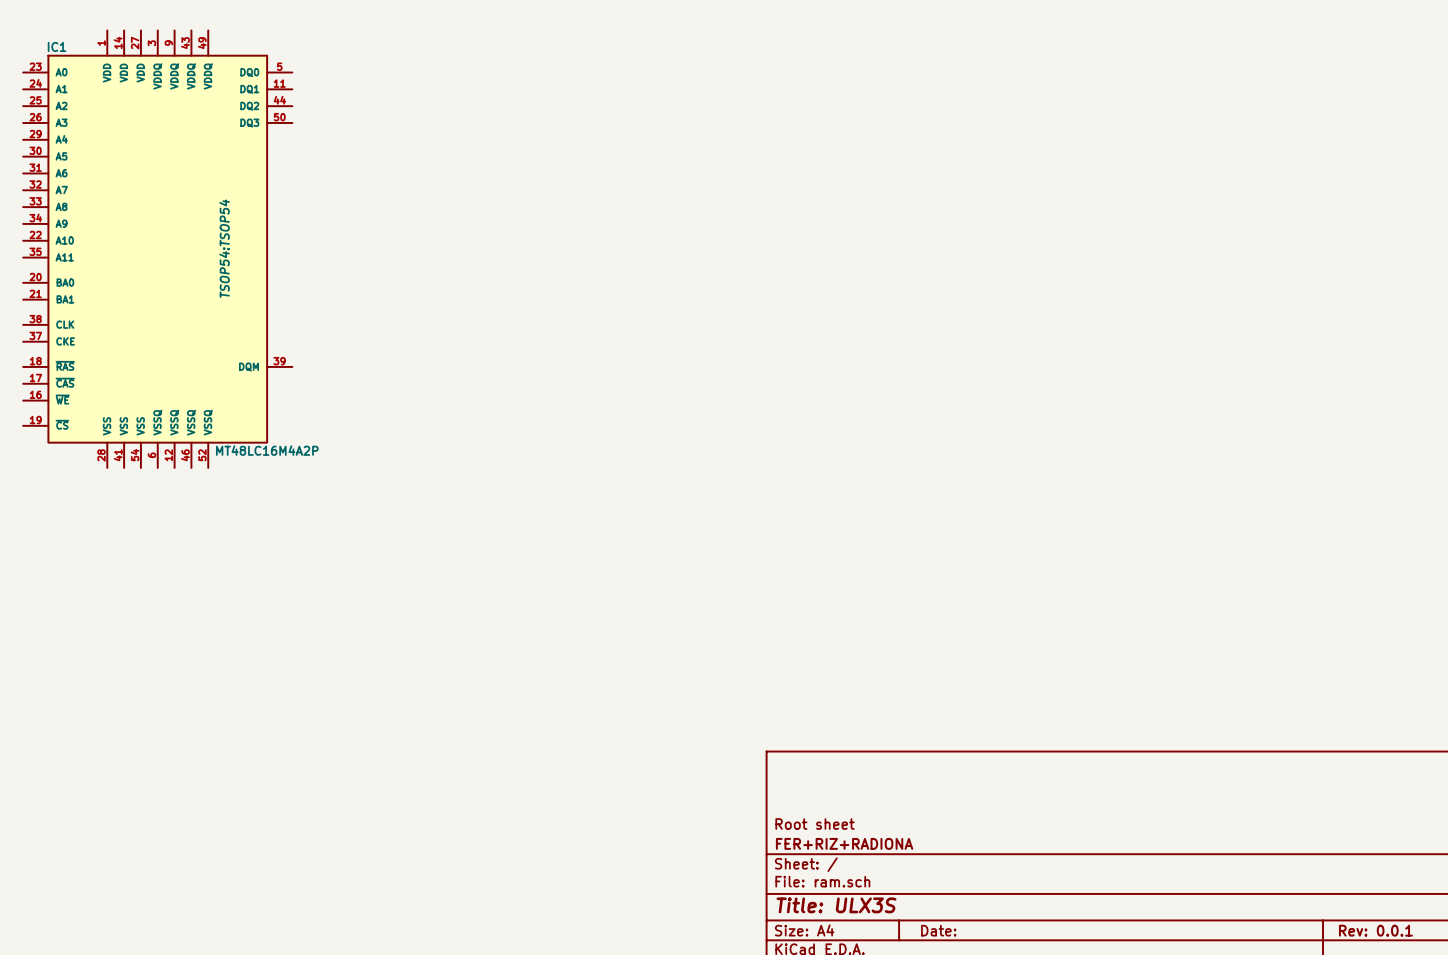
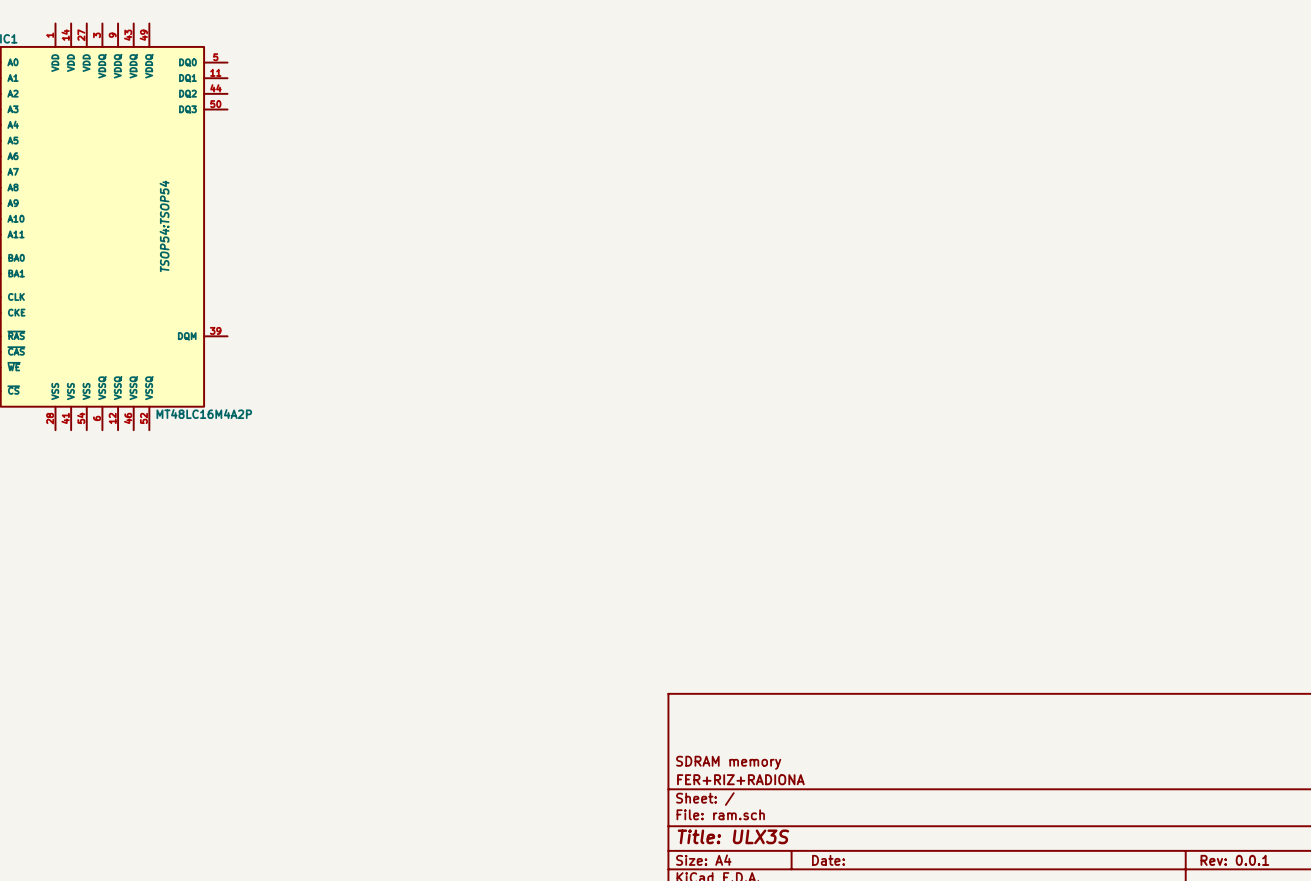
title block: Root sheet (815, 824) -> SDRAM memory (728, 762)

